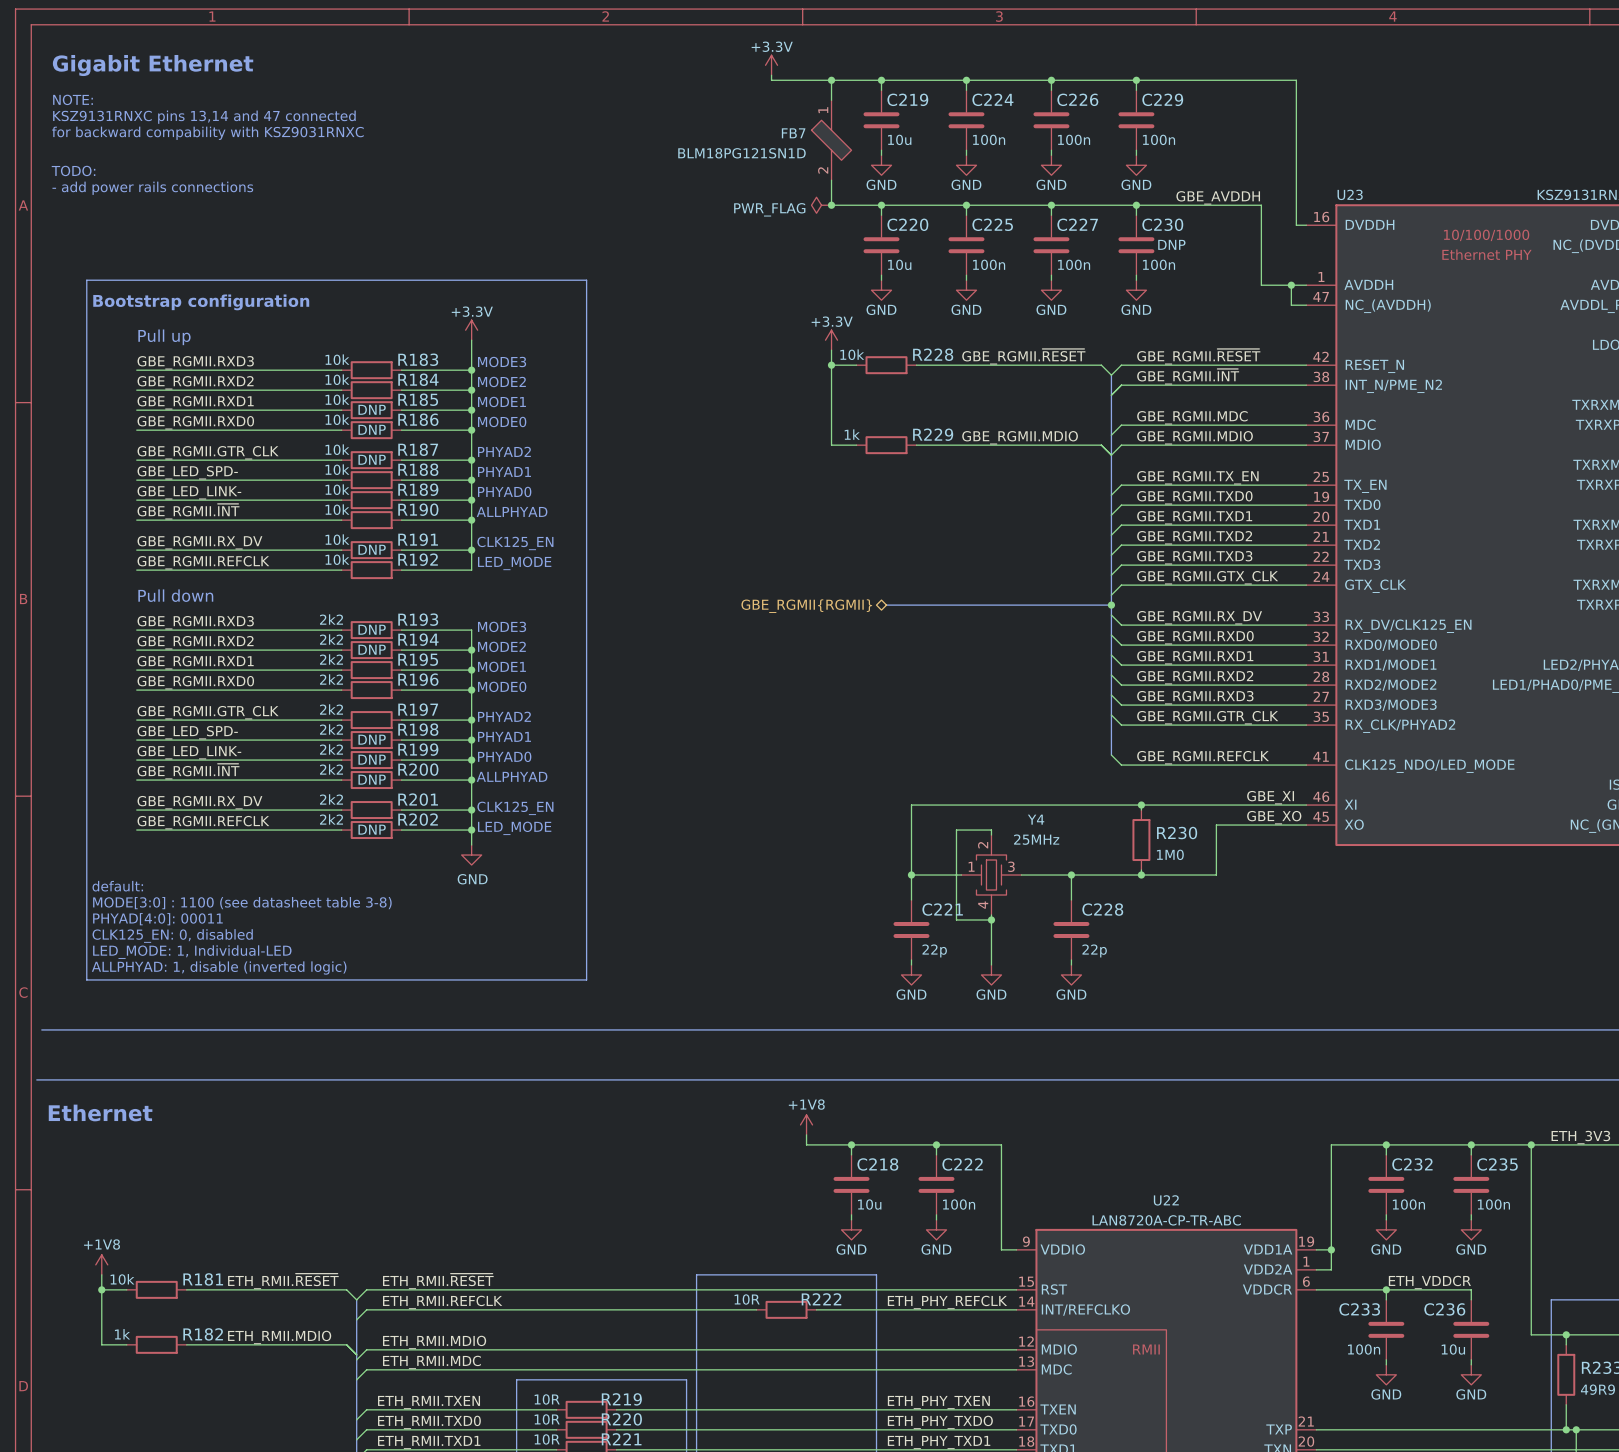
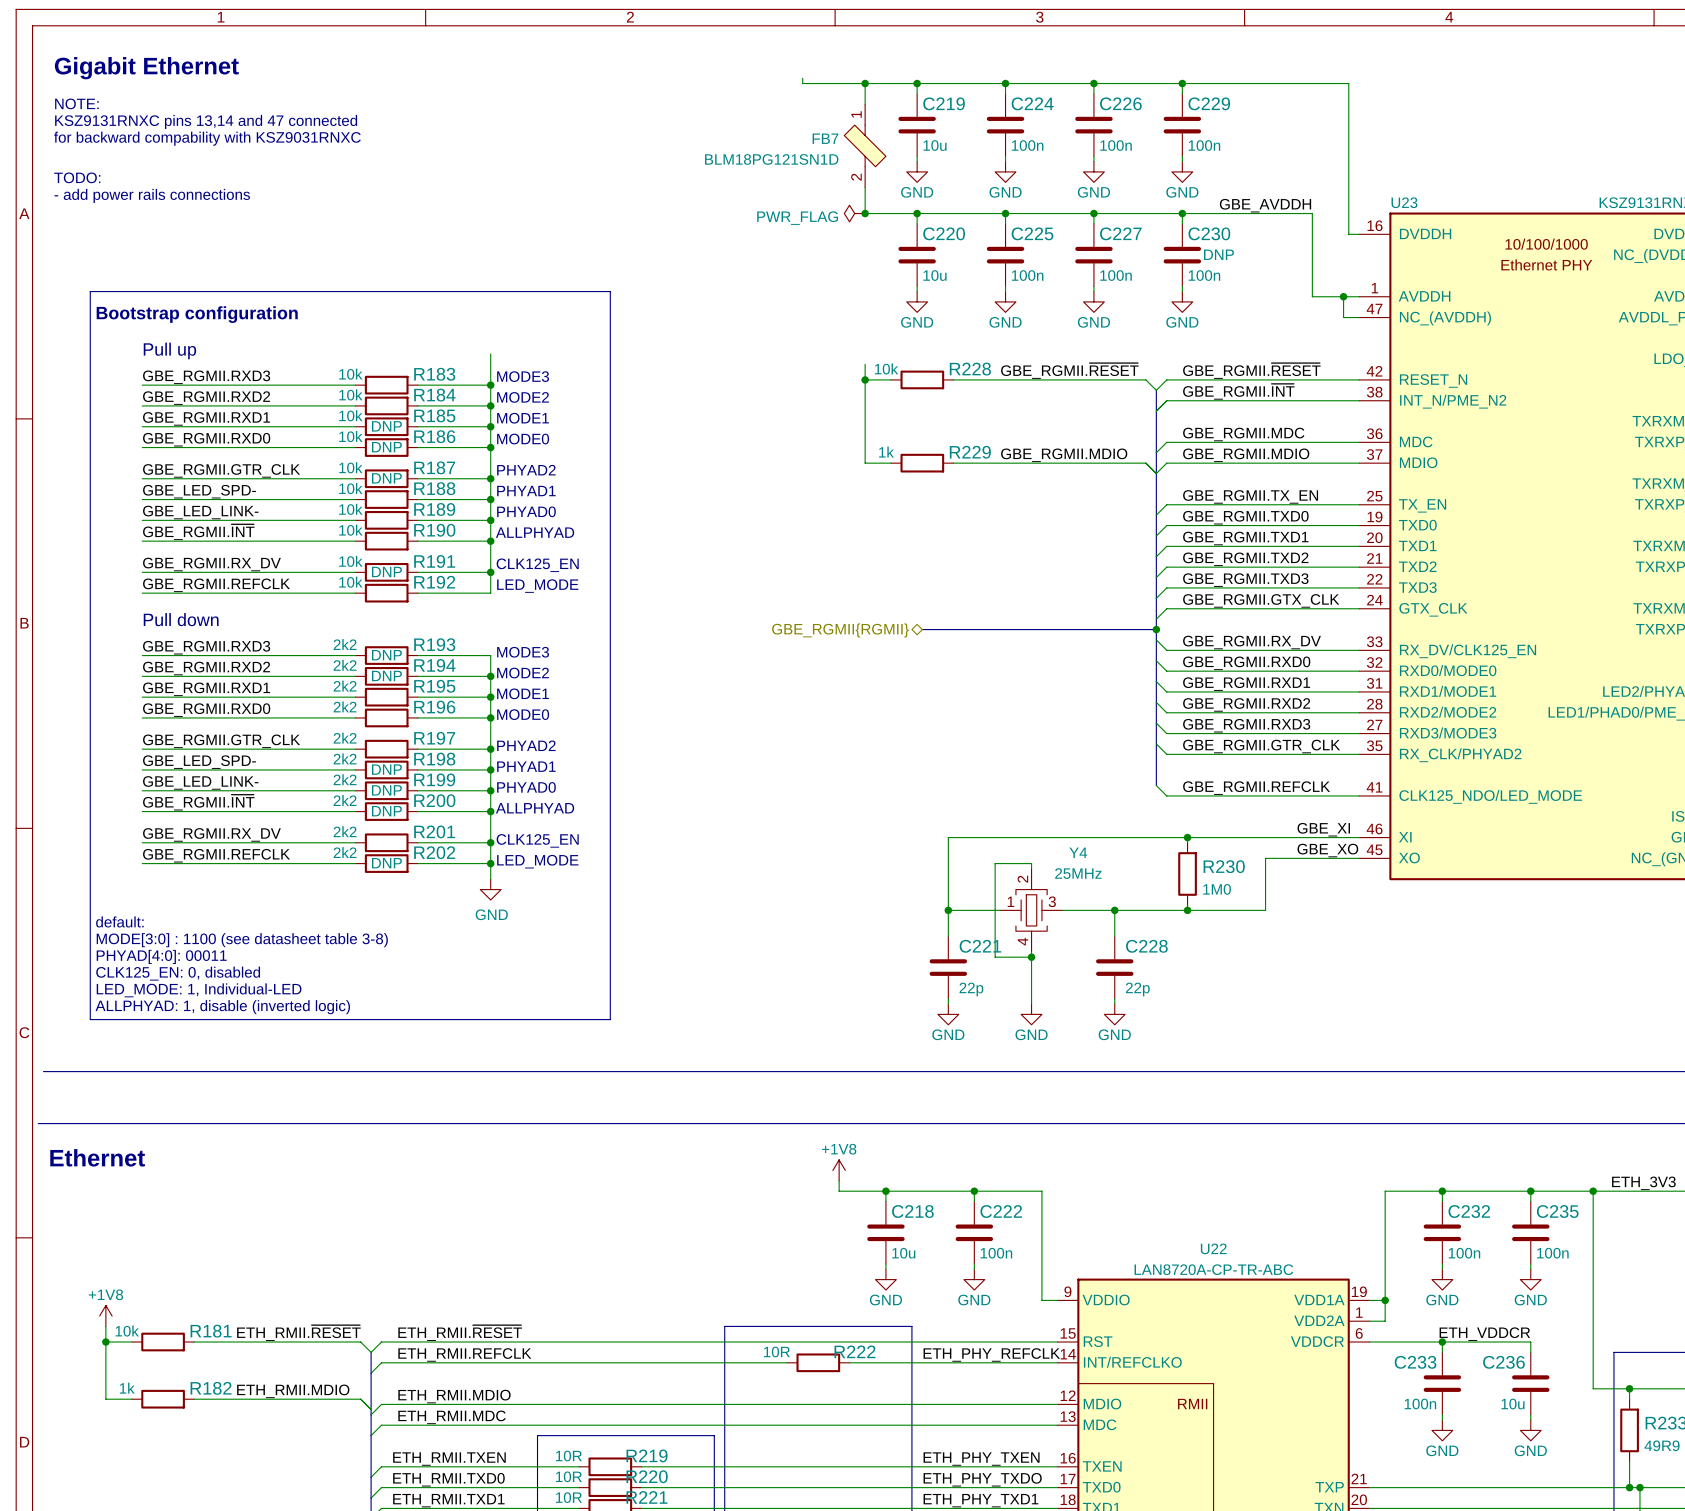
power symbol: +3.3V (771, 65) -> none
power symbol: +3.3V (471, 330) -> none
power symbol: +3.3V (831, 340) -> none

